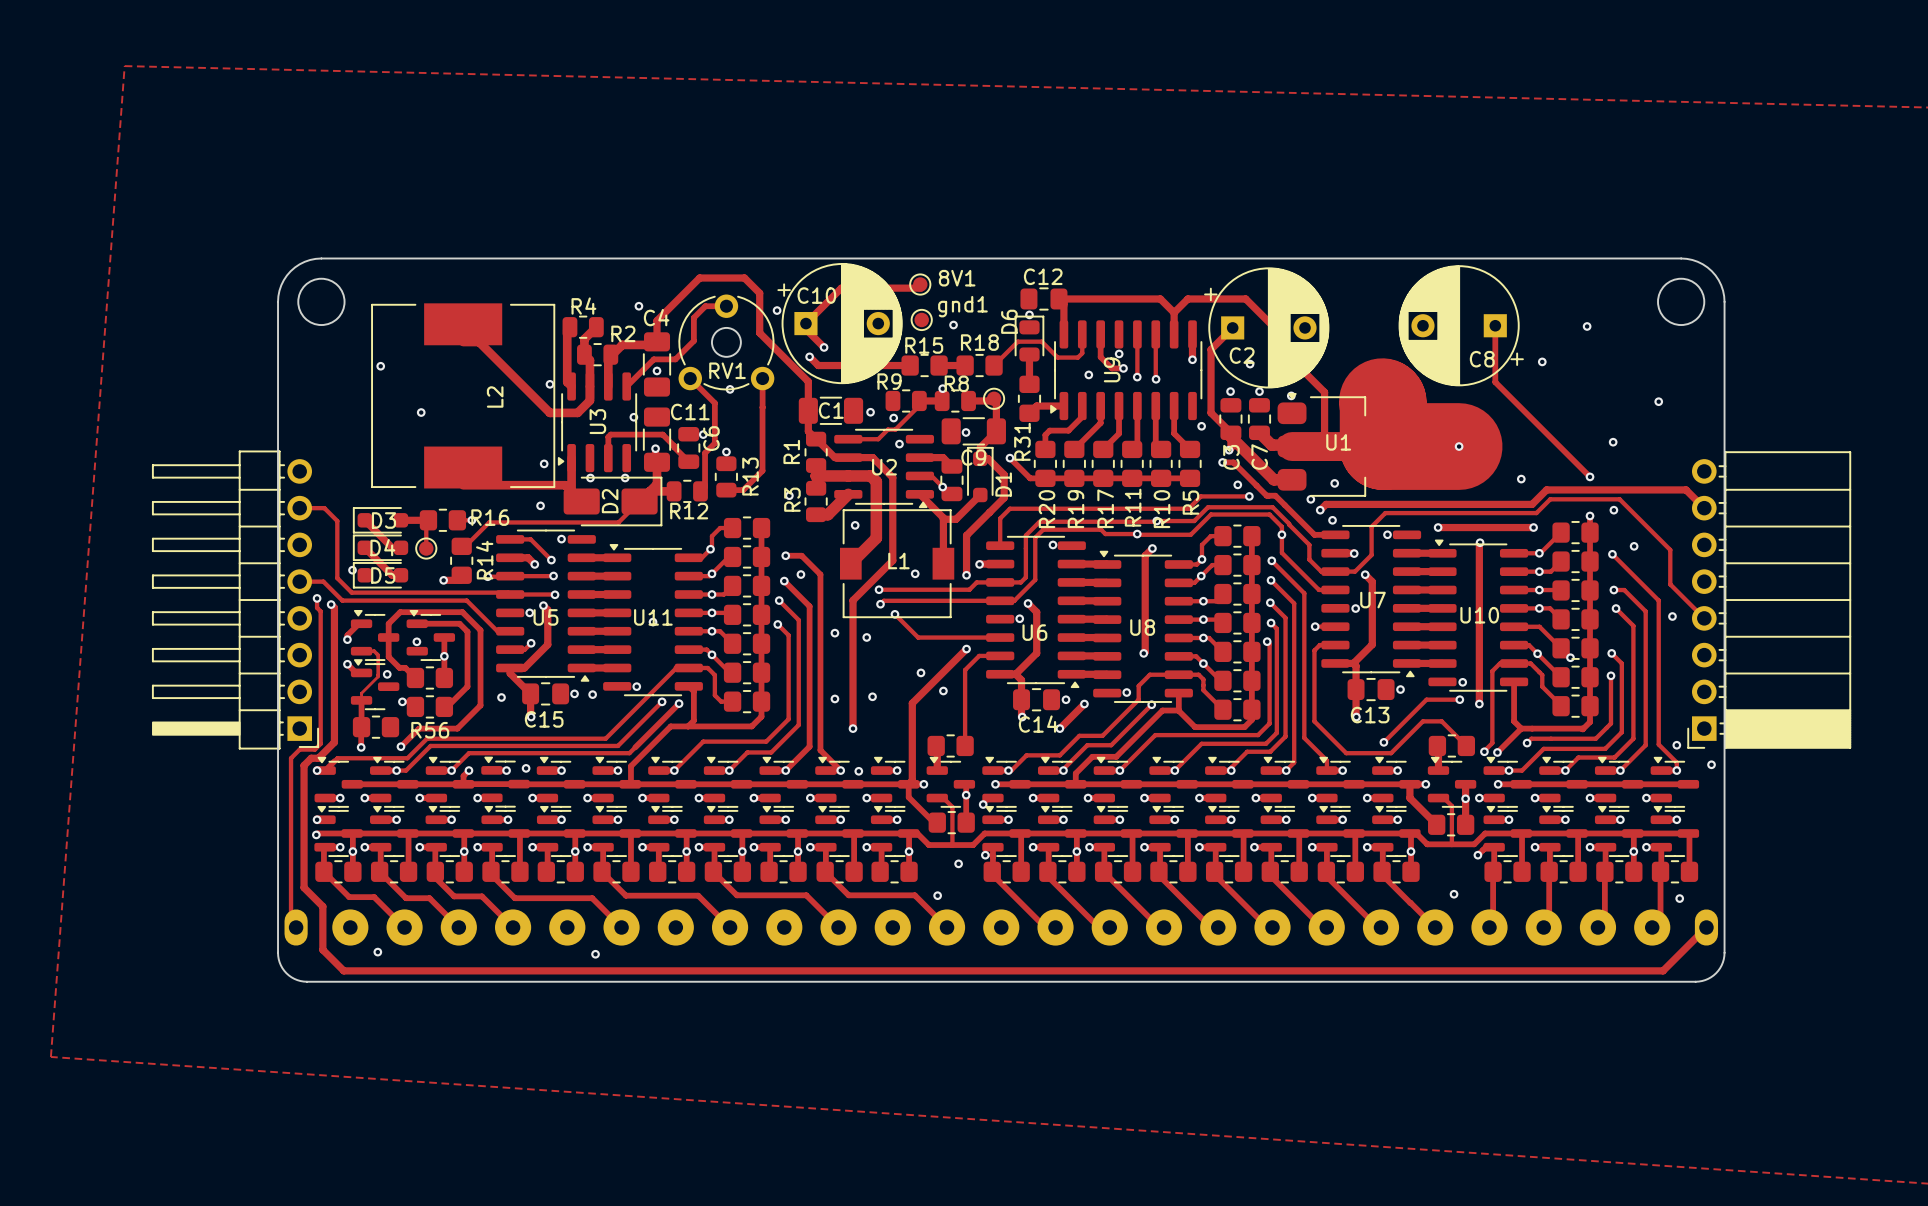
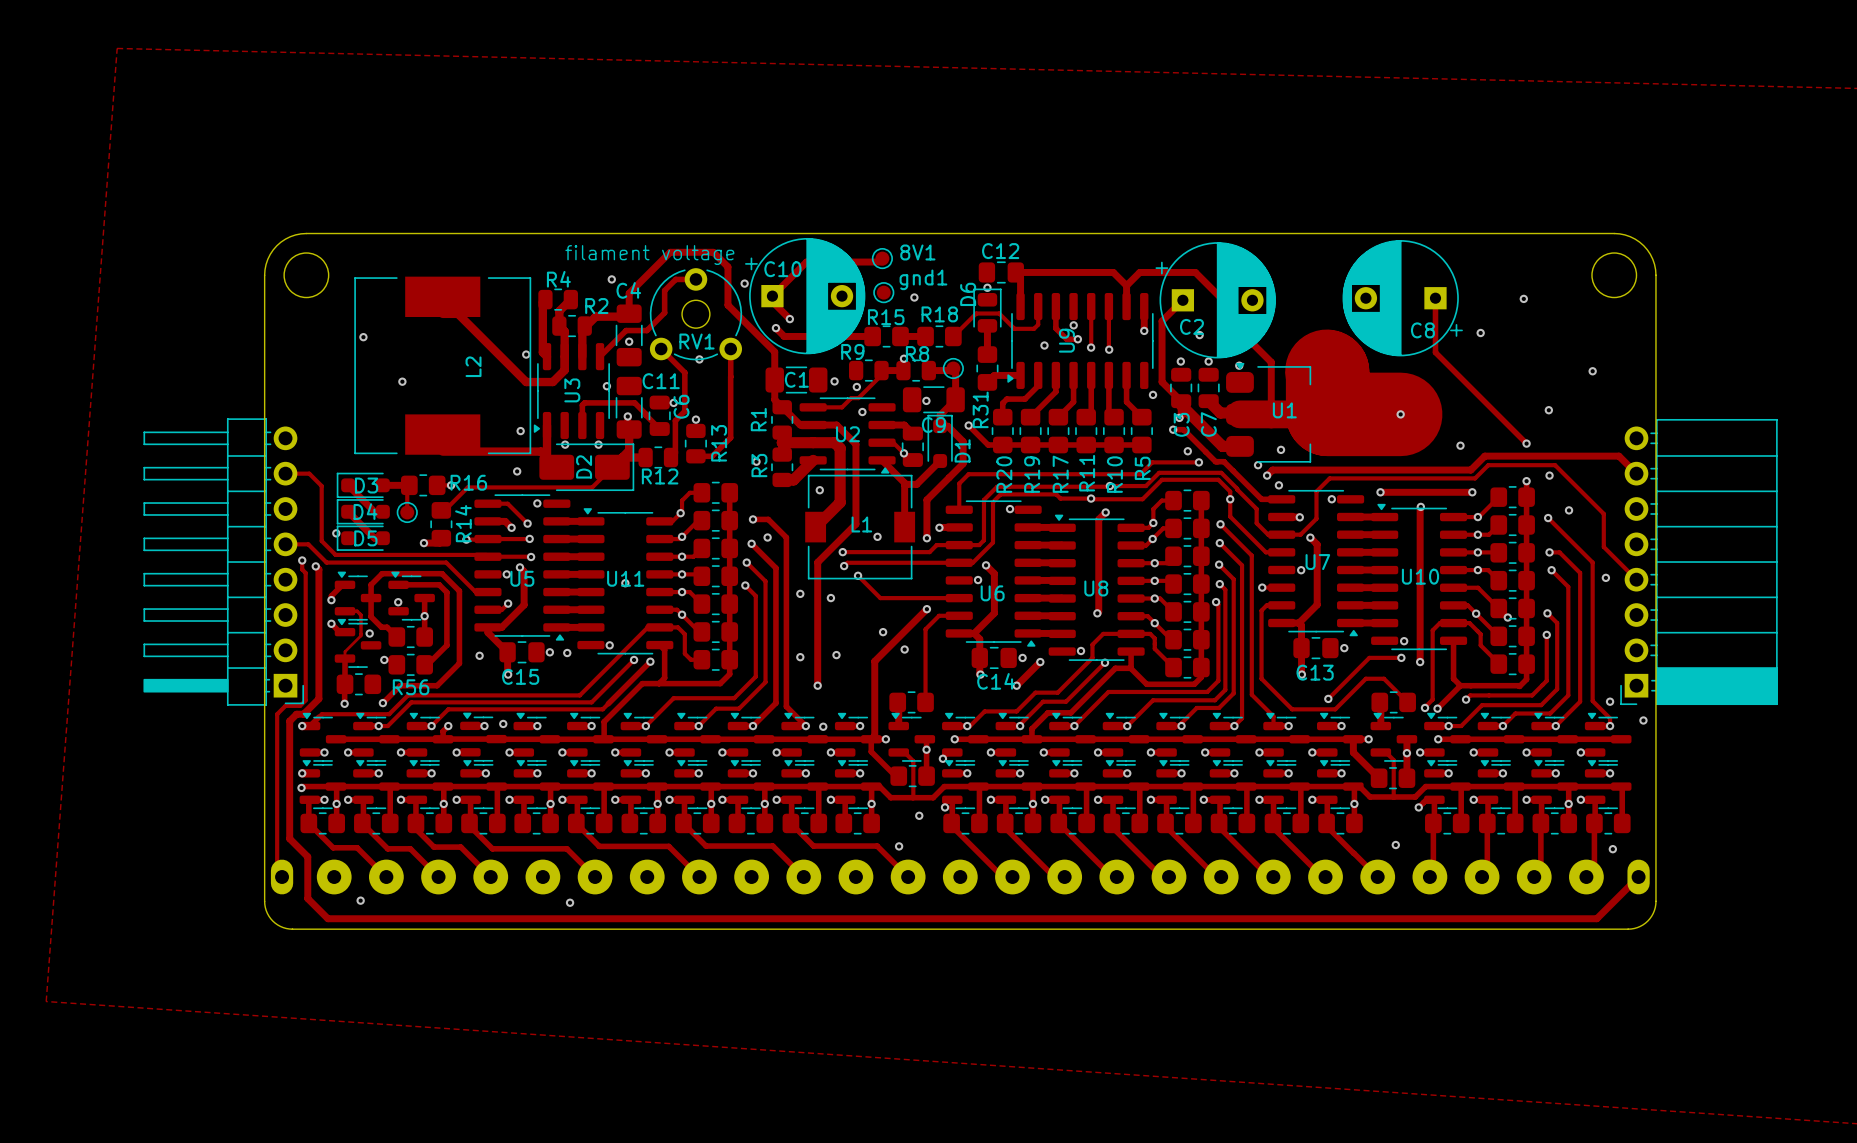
text: none -> filament voltage (649, 255)

